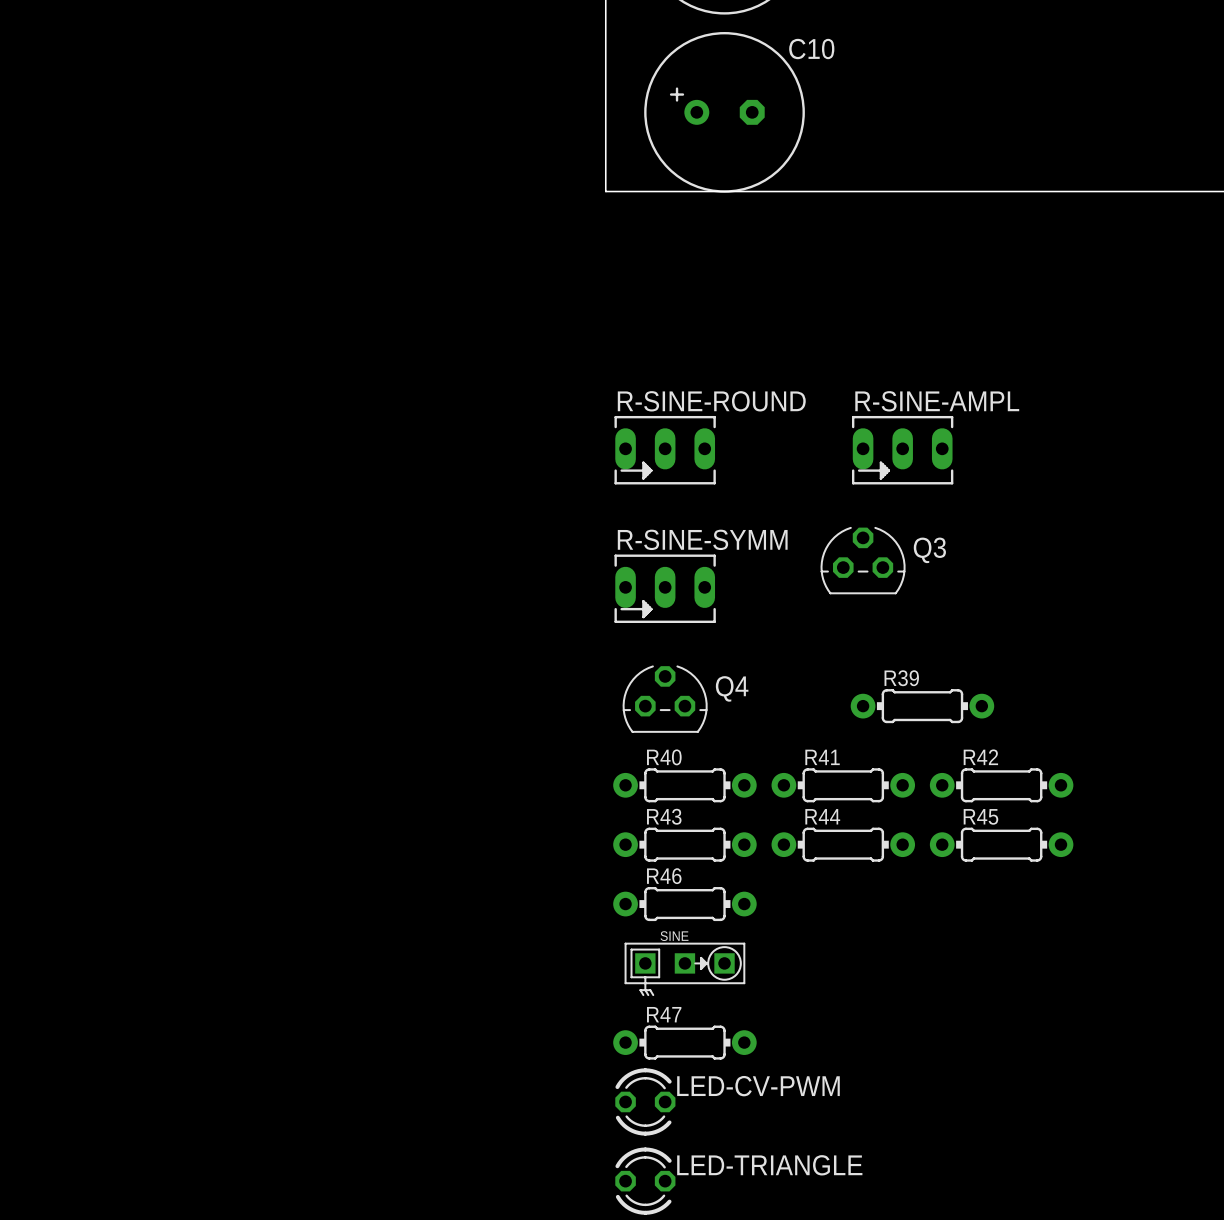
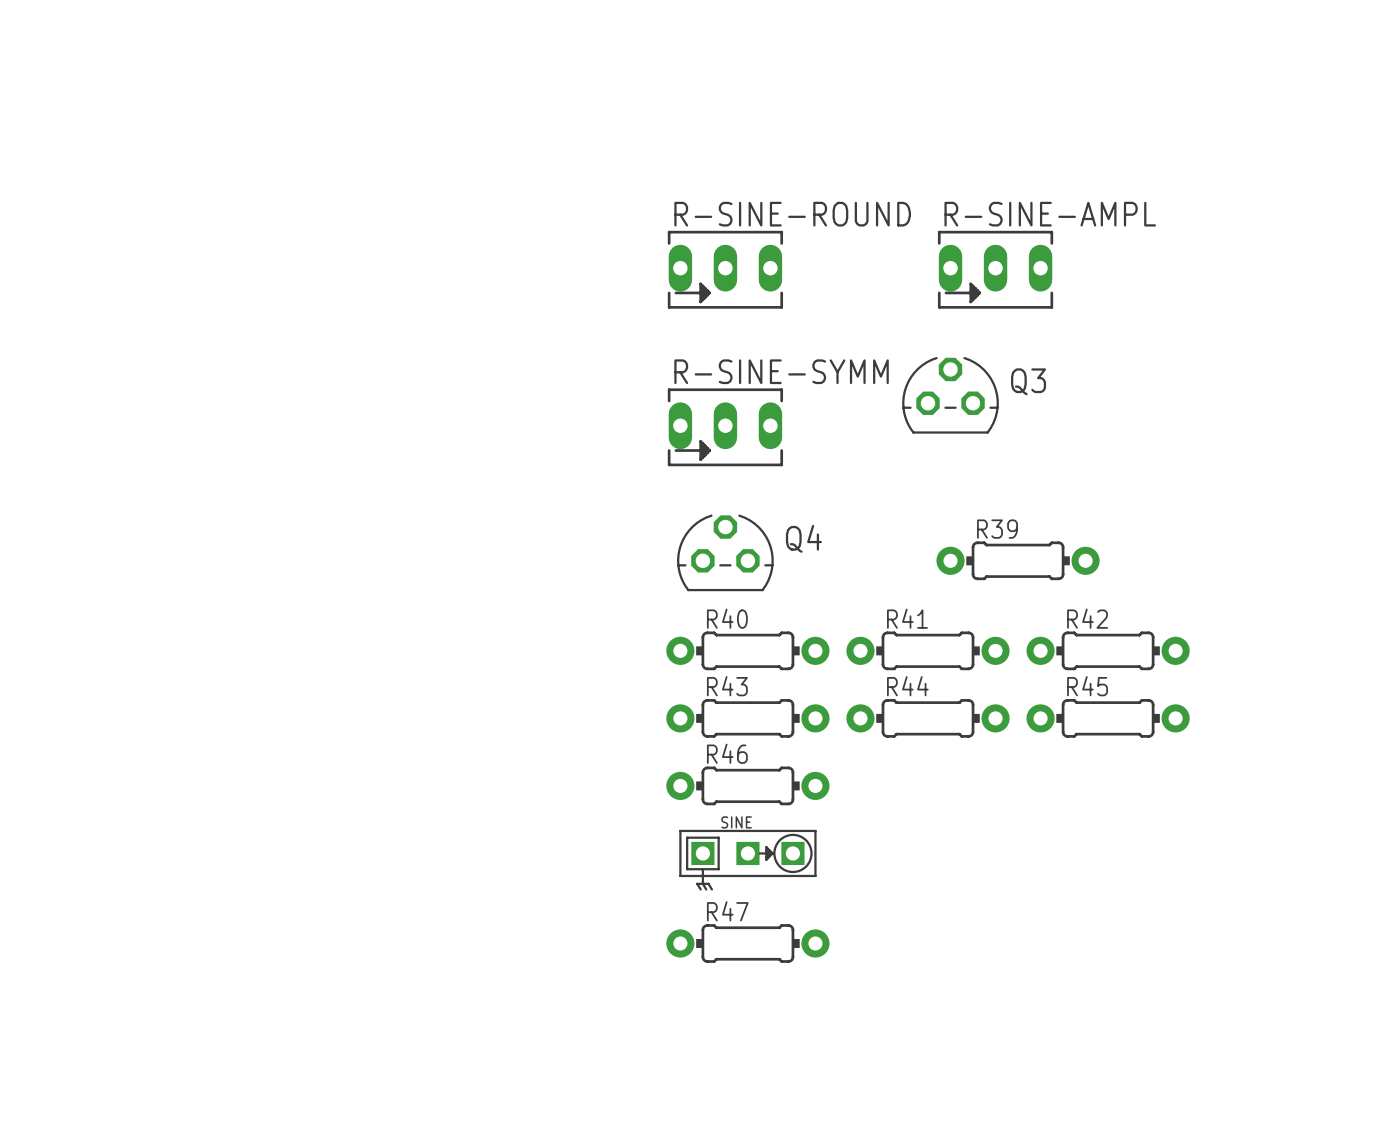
LED-CV-PWM: (645, 1101) -> none
LED-TRIANGLE: (645, 1181) -> none

